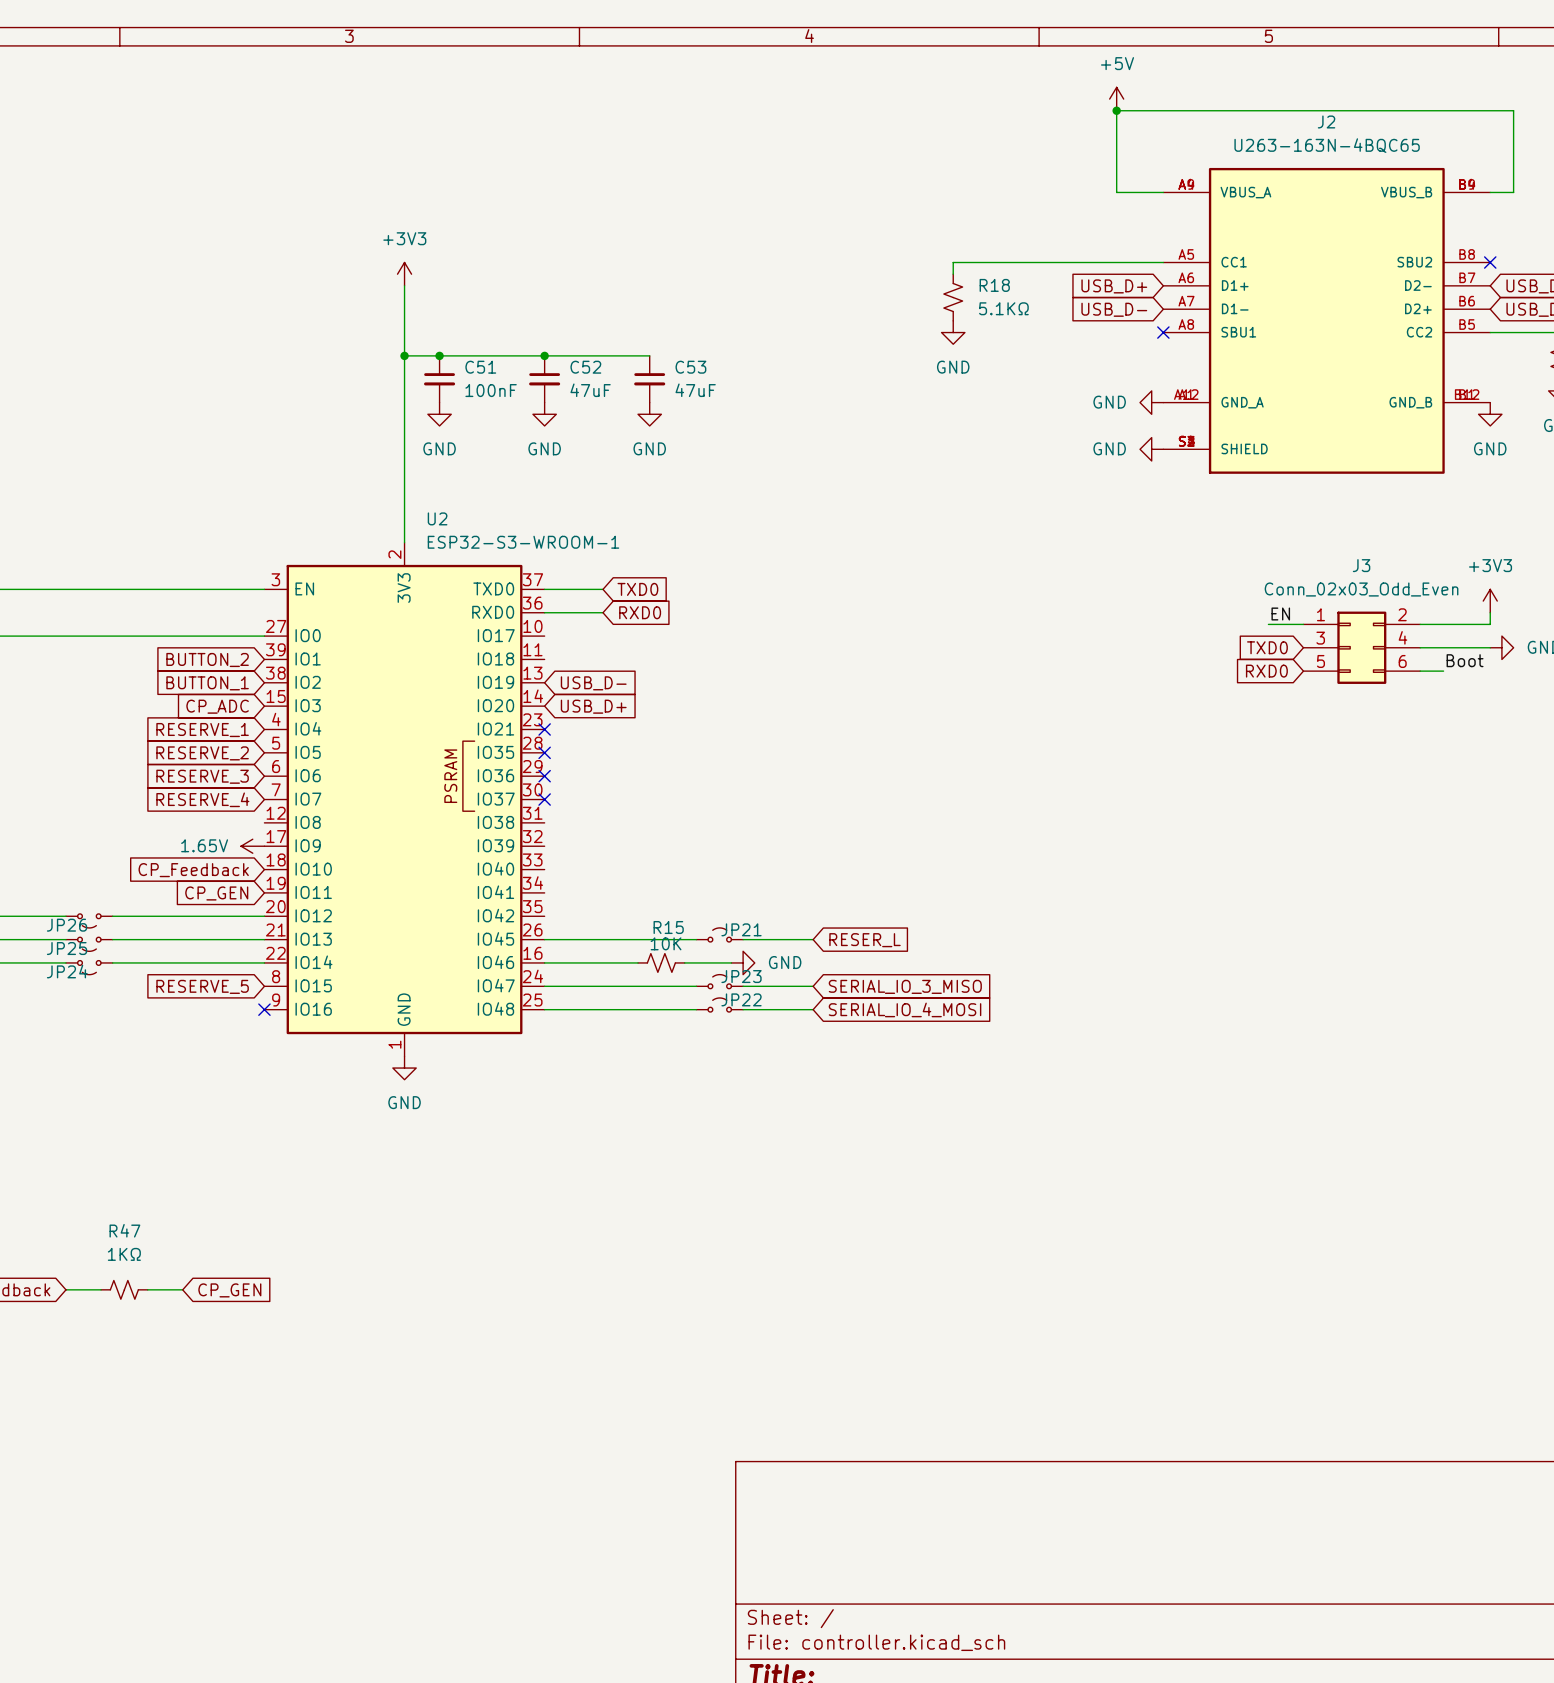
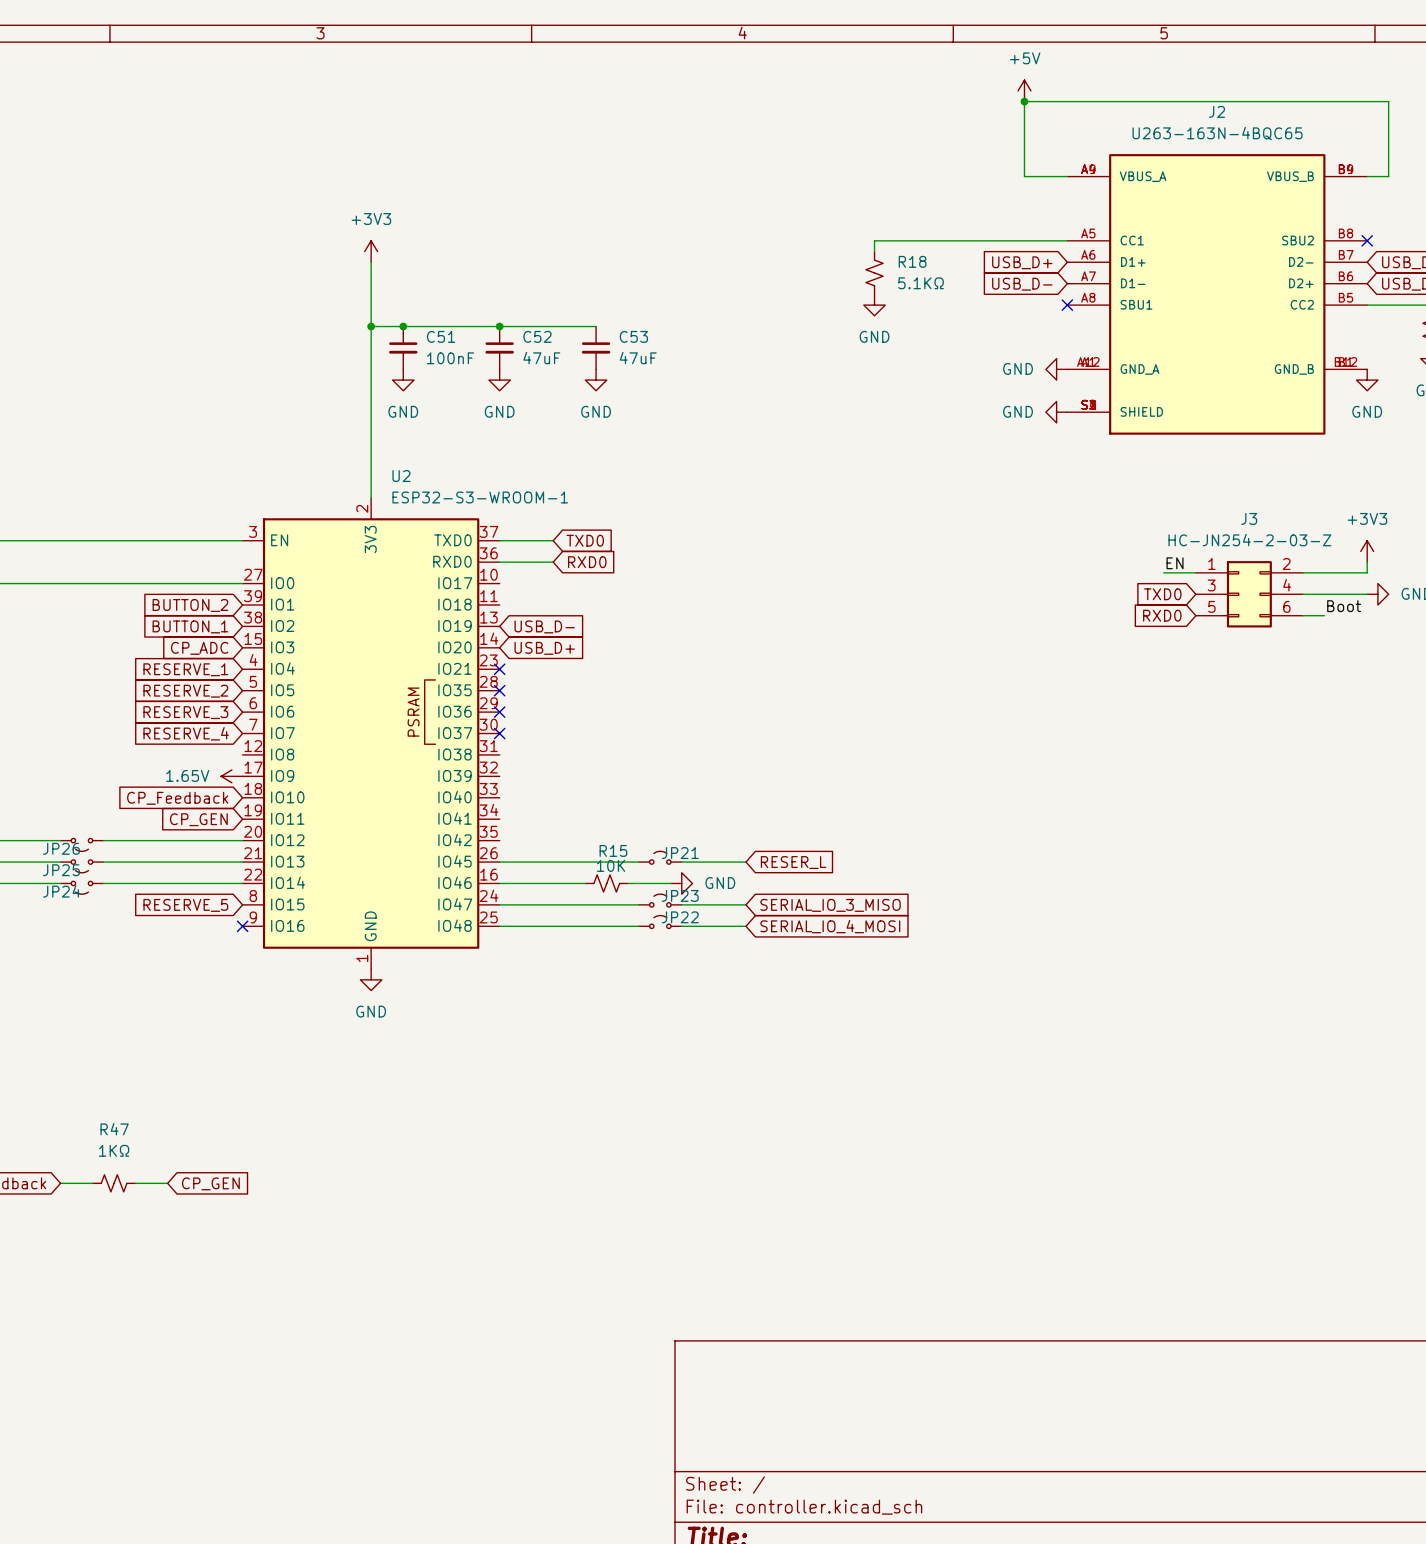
J3 value: Conn_02x03_Odd_Even (1361, 589) -> HC-JN254-2-03-Z (1249, 540)

